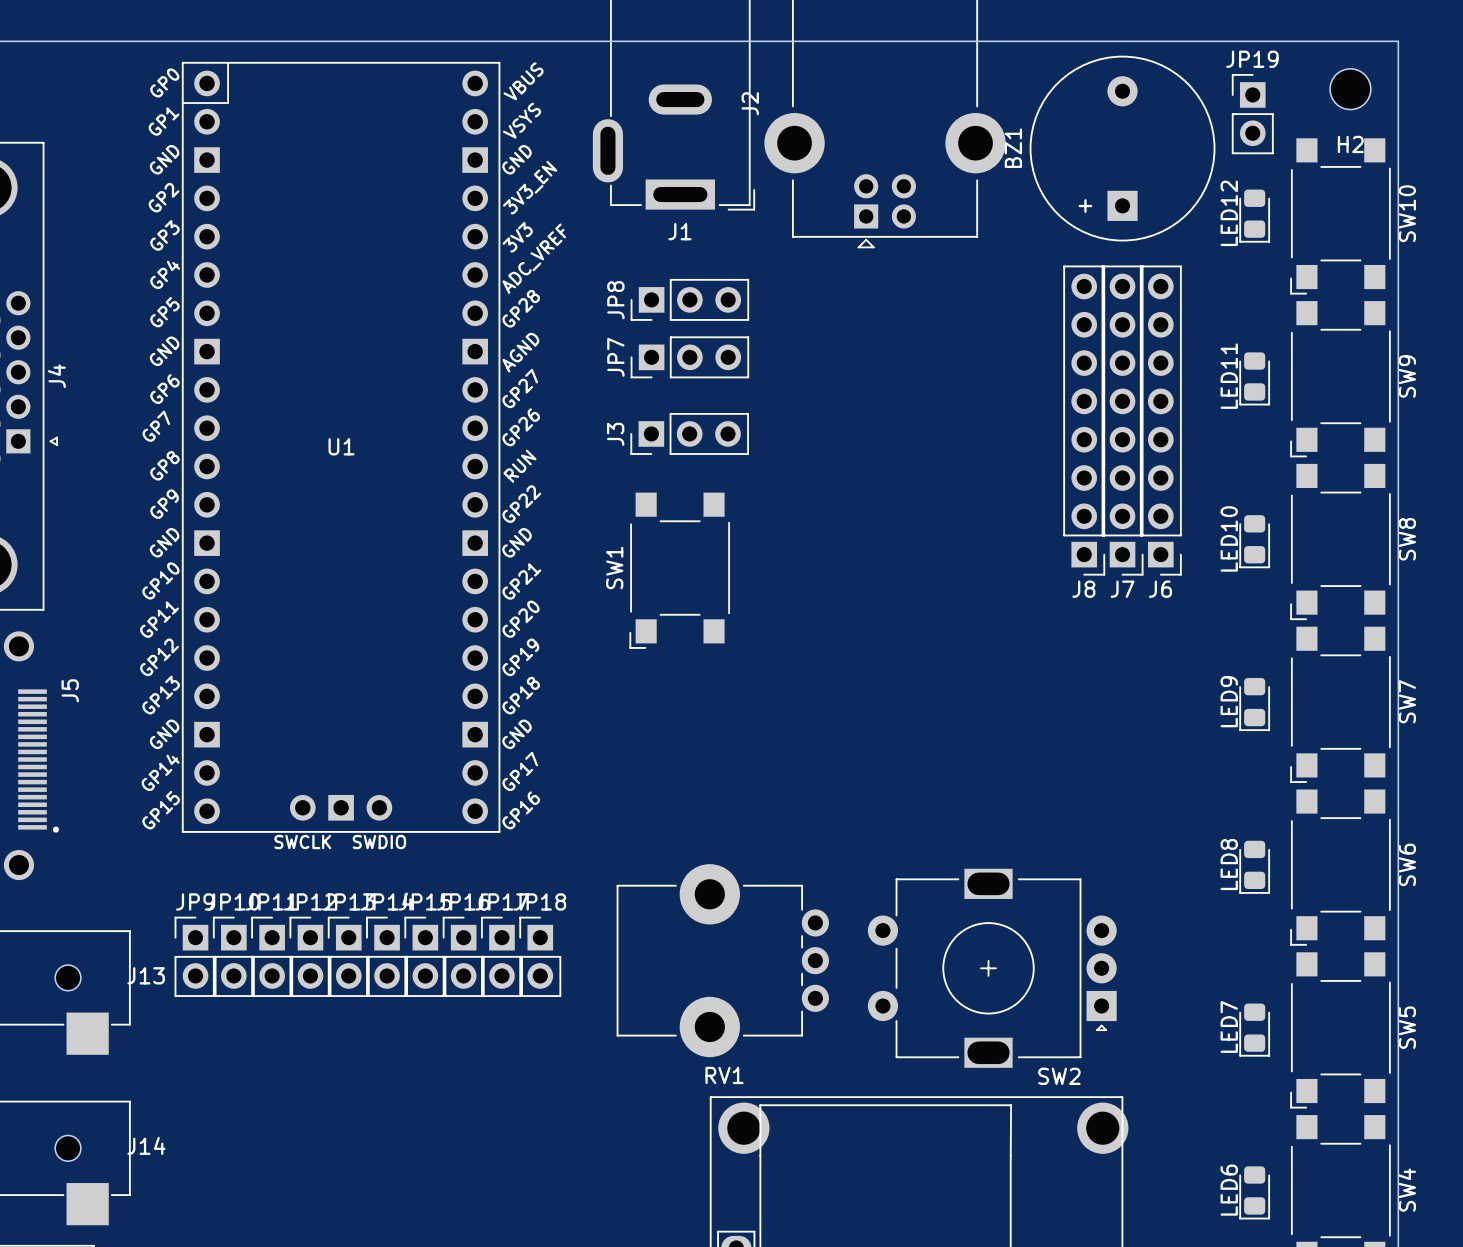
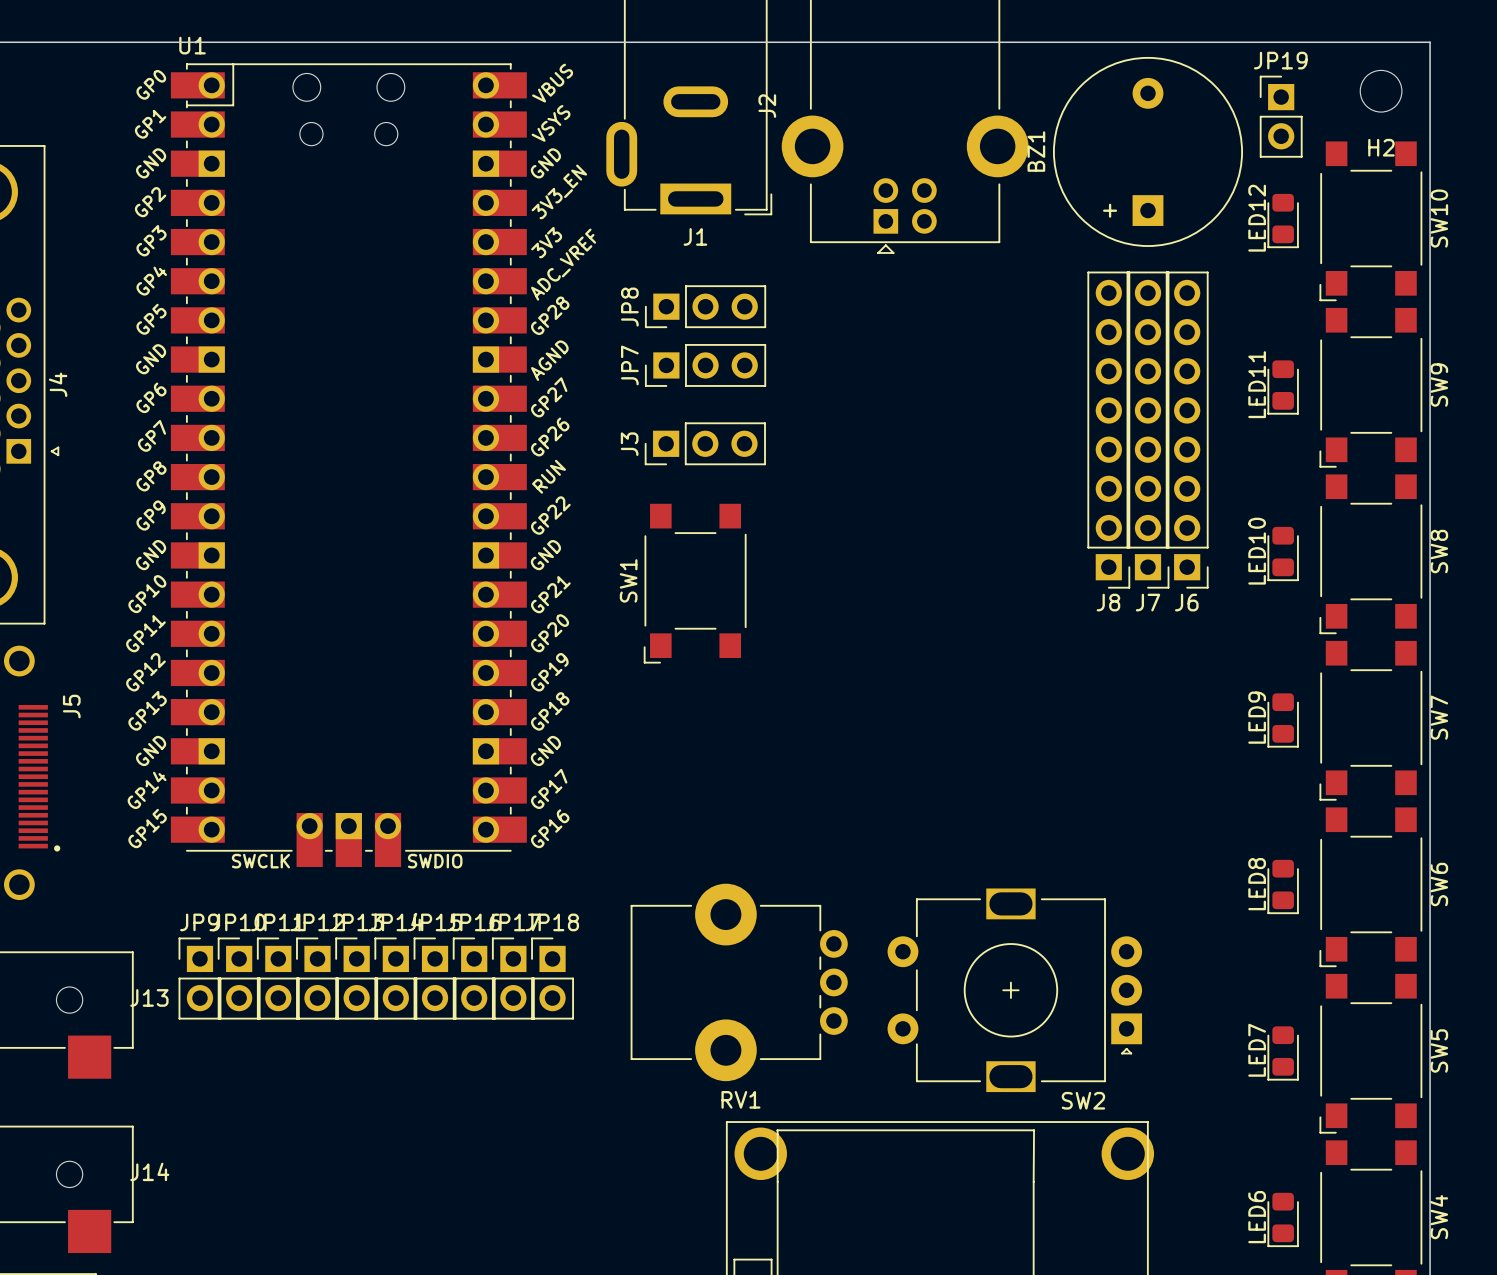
U1 footprint: [181, 61, 501, 833] -> [170, 63, 527, 867]
U1 name position: U1 (341, 446) -> U1 (192, 45)

